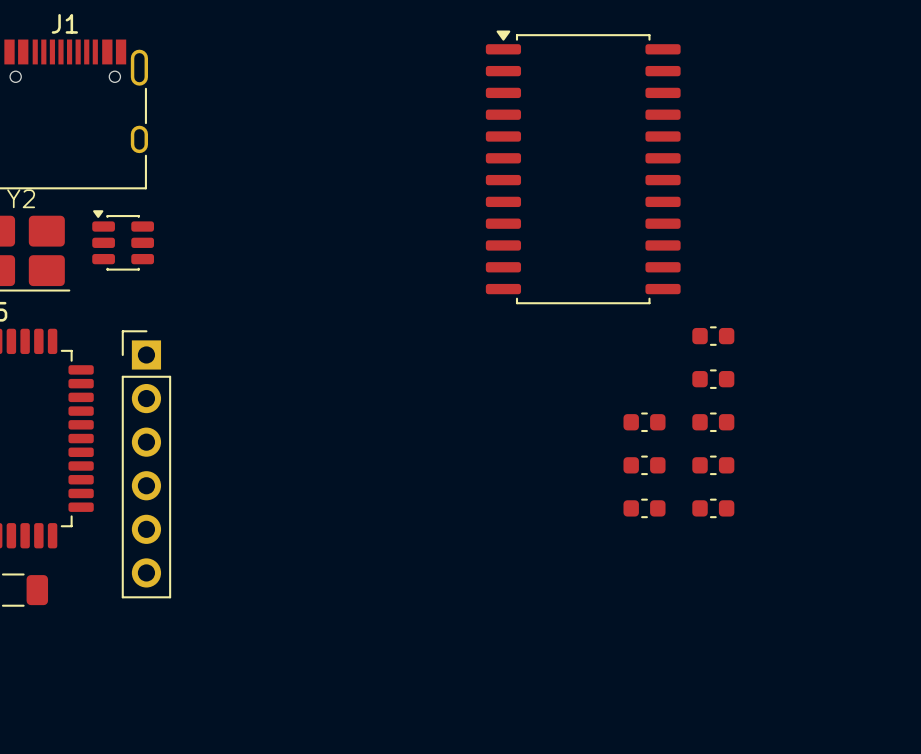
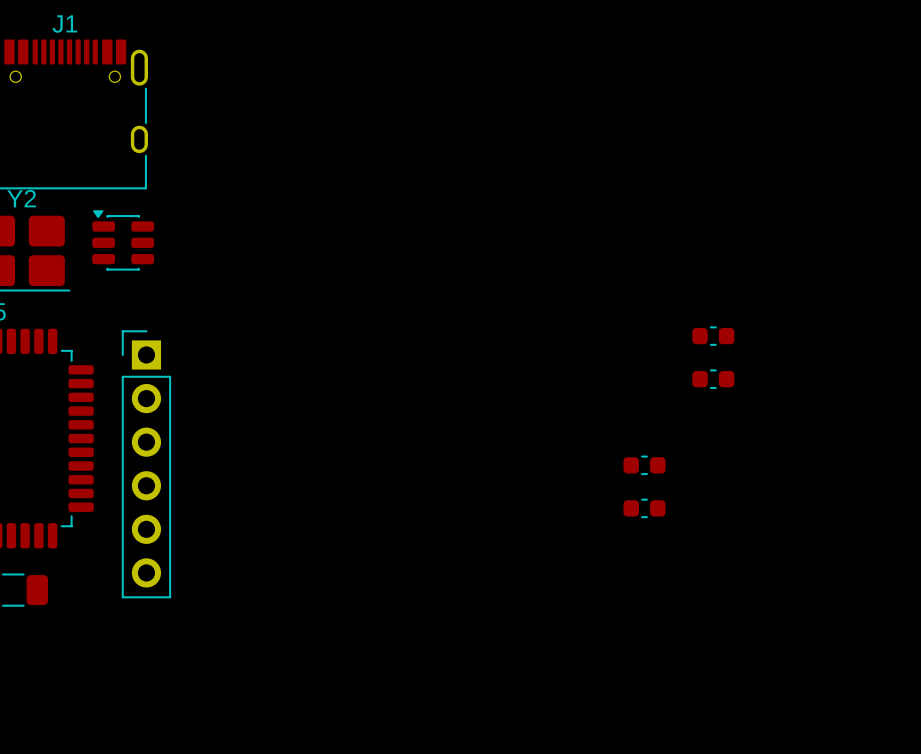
part: (583, 167) -> none
part: (644, 422) -> none
part: (713, 422) -> none
part: (713, 465) -> none
part: (713, 508) -> none

